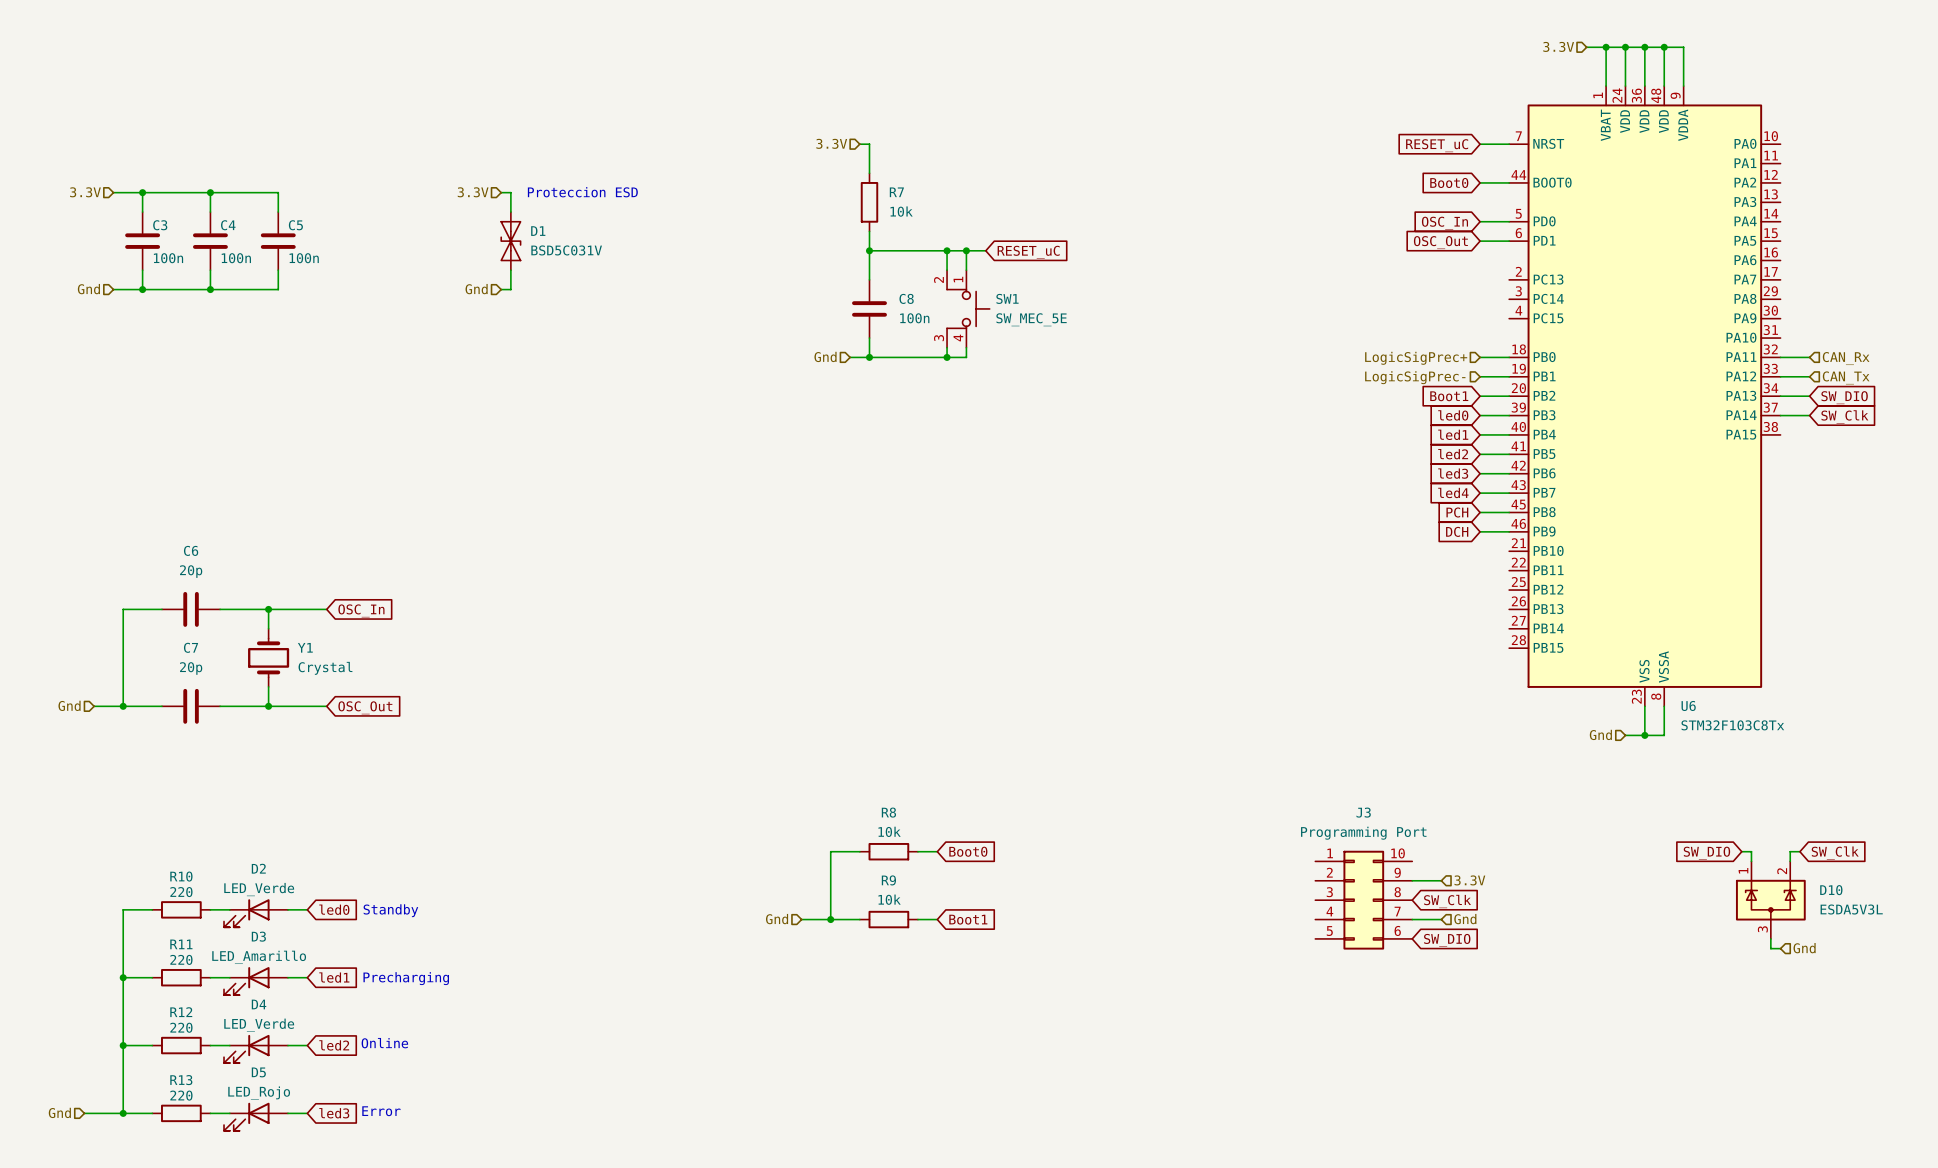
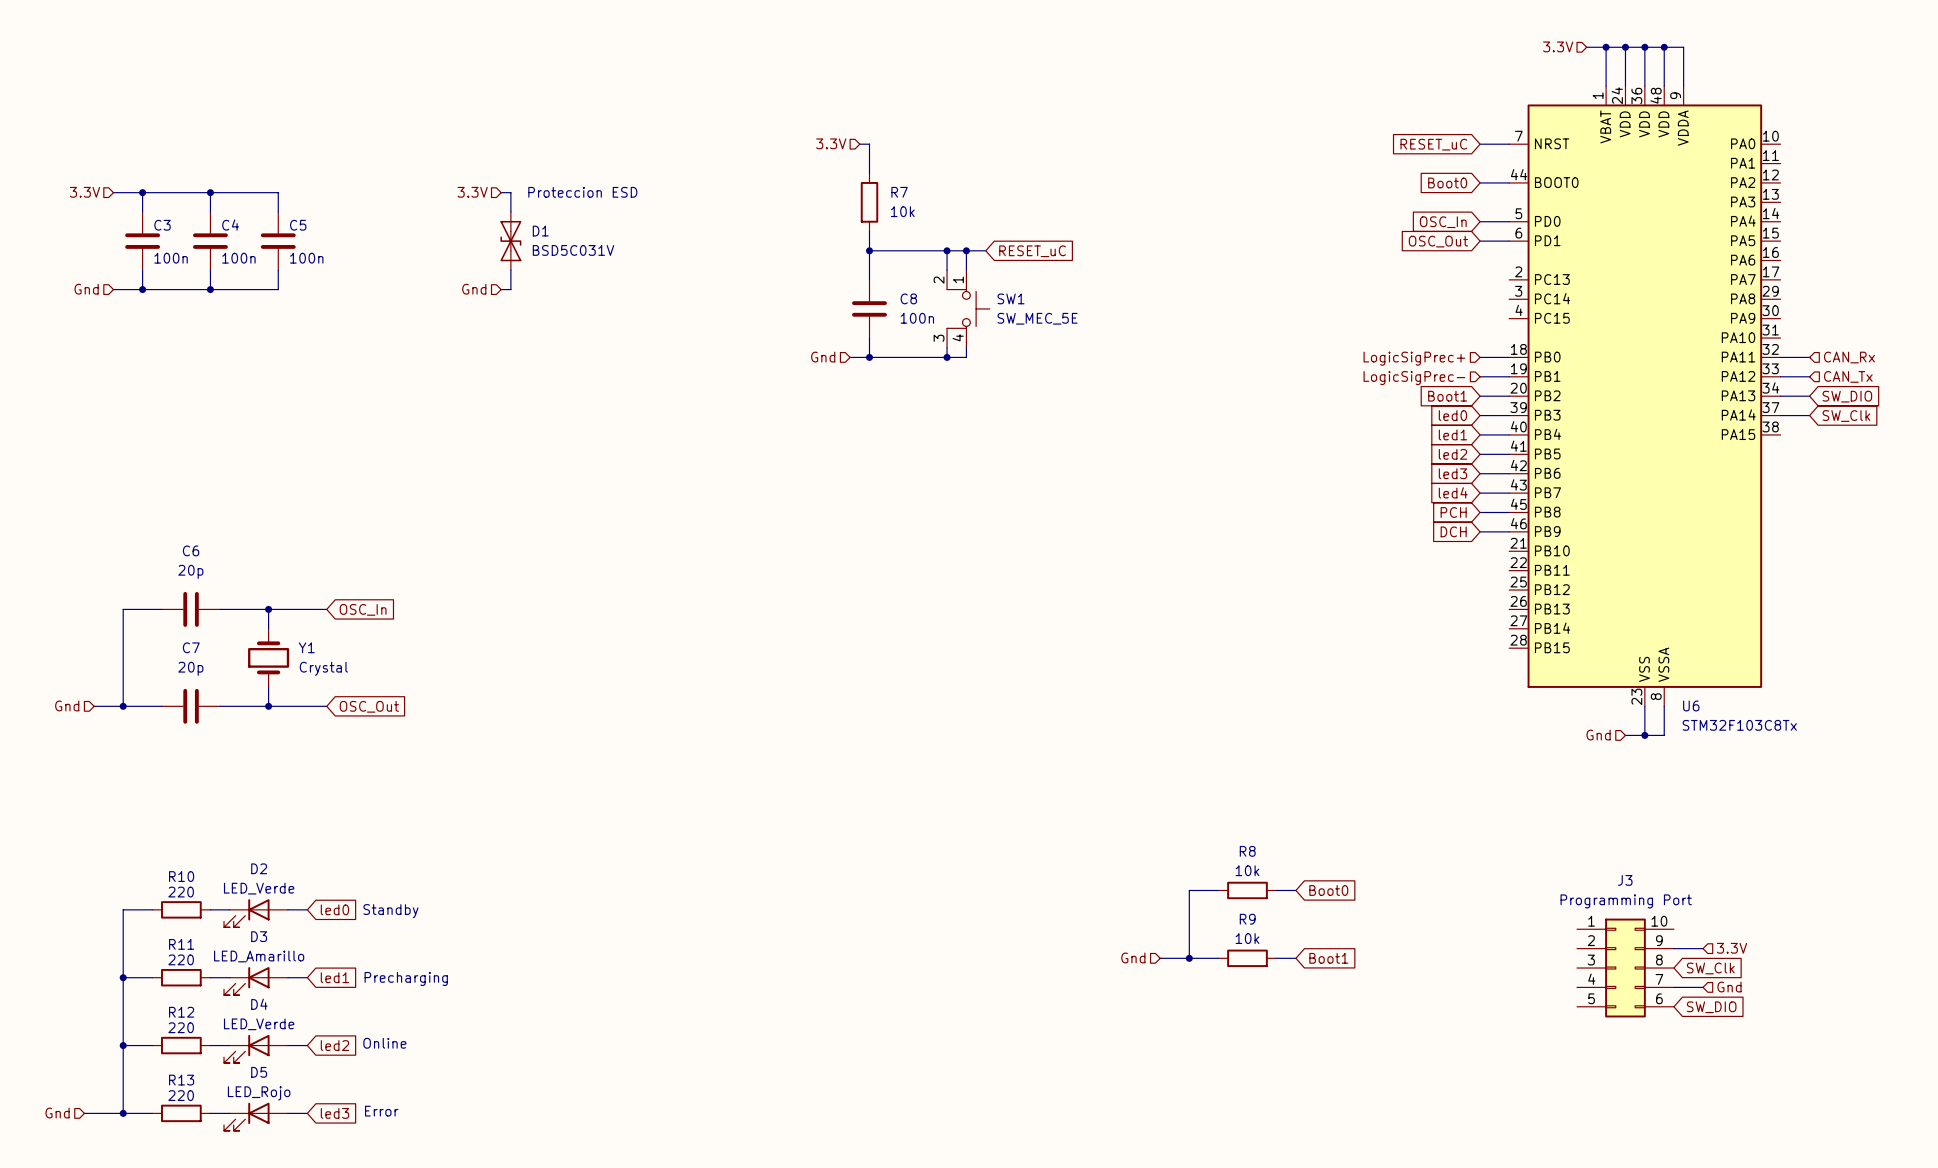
wire: (859, 851) (830, 851) (830, 919) -> none
R8 position: (888, 851) -> (1247, 890)
wire: (917, 851) (937, 851) -> none
global label: Boot0 (968, 851) -> none
wire: (1741, 851) (1751, 851) (1751, 861) -> none
wire: (1799, 851) (1790, 851) (1790, 861) -> none
global label: SW_DIO (1706, 853) -> none
global label: SW_Clk (1835, 853) -> none
wire: (1412, 880) (1441, 880) -> none
hierarchical label: 3.3V (1469, 880) -> none
wire: none -> (1218, 890) (1189, 890) (1189, 958)
wire: none -> (1276, 890) (1295, 890)
global label: none -> Boot0 (1328, 890)
J3 position: (1363, 900) -> (1625, 968)
D10: ESDA5V3L (1770, 900) -> none
global label: SW_Clk (1447, 901) -> none
hierarchical label: Gnd (777, 919) -> none
wire: (801, 919) (859, 919) -> none
junction: (830, 919) -> none
R9 position: (888, 919) -> (1247, 958)
wire: (917, 919) (937, 919) -> none
global label: Boot1 (968, 919) -> none
wire: (1412, 919) (1441, 919) -> none
hierarchical label: Gnd (1465, 919) -> none
wire: (1770, 938) (1770, 948) (1780, 948) -> none
global label: SW_DIO (1447, 940) -> none
wire: none -> (1673, 948) (1703, 948)
hierarchical label: none -> 3.3V (1732, 948)
hierarchical label position: Gnd (1804, 948) -> Gnd (1729, 987)
hierarchical label: none -> Gnd (1133, 957)
wire: none -> (1160, 958) (1218, 958)
junction: none -> (1189, 958)
wire: none -> (1276, 958) (1295, 958)
global label: none -> Boot1 (1328, 958)
global label: none -> SW_Clk (1710, 968)
wire: none -> (1673, 987) (1703, 987)
global label: none -> SW_DIO (1711, 1007)

